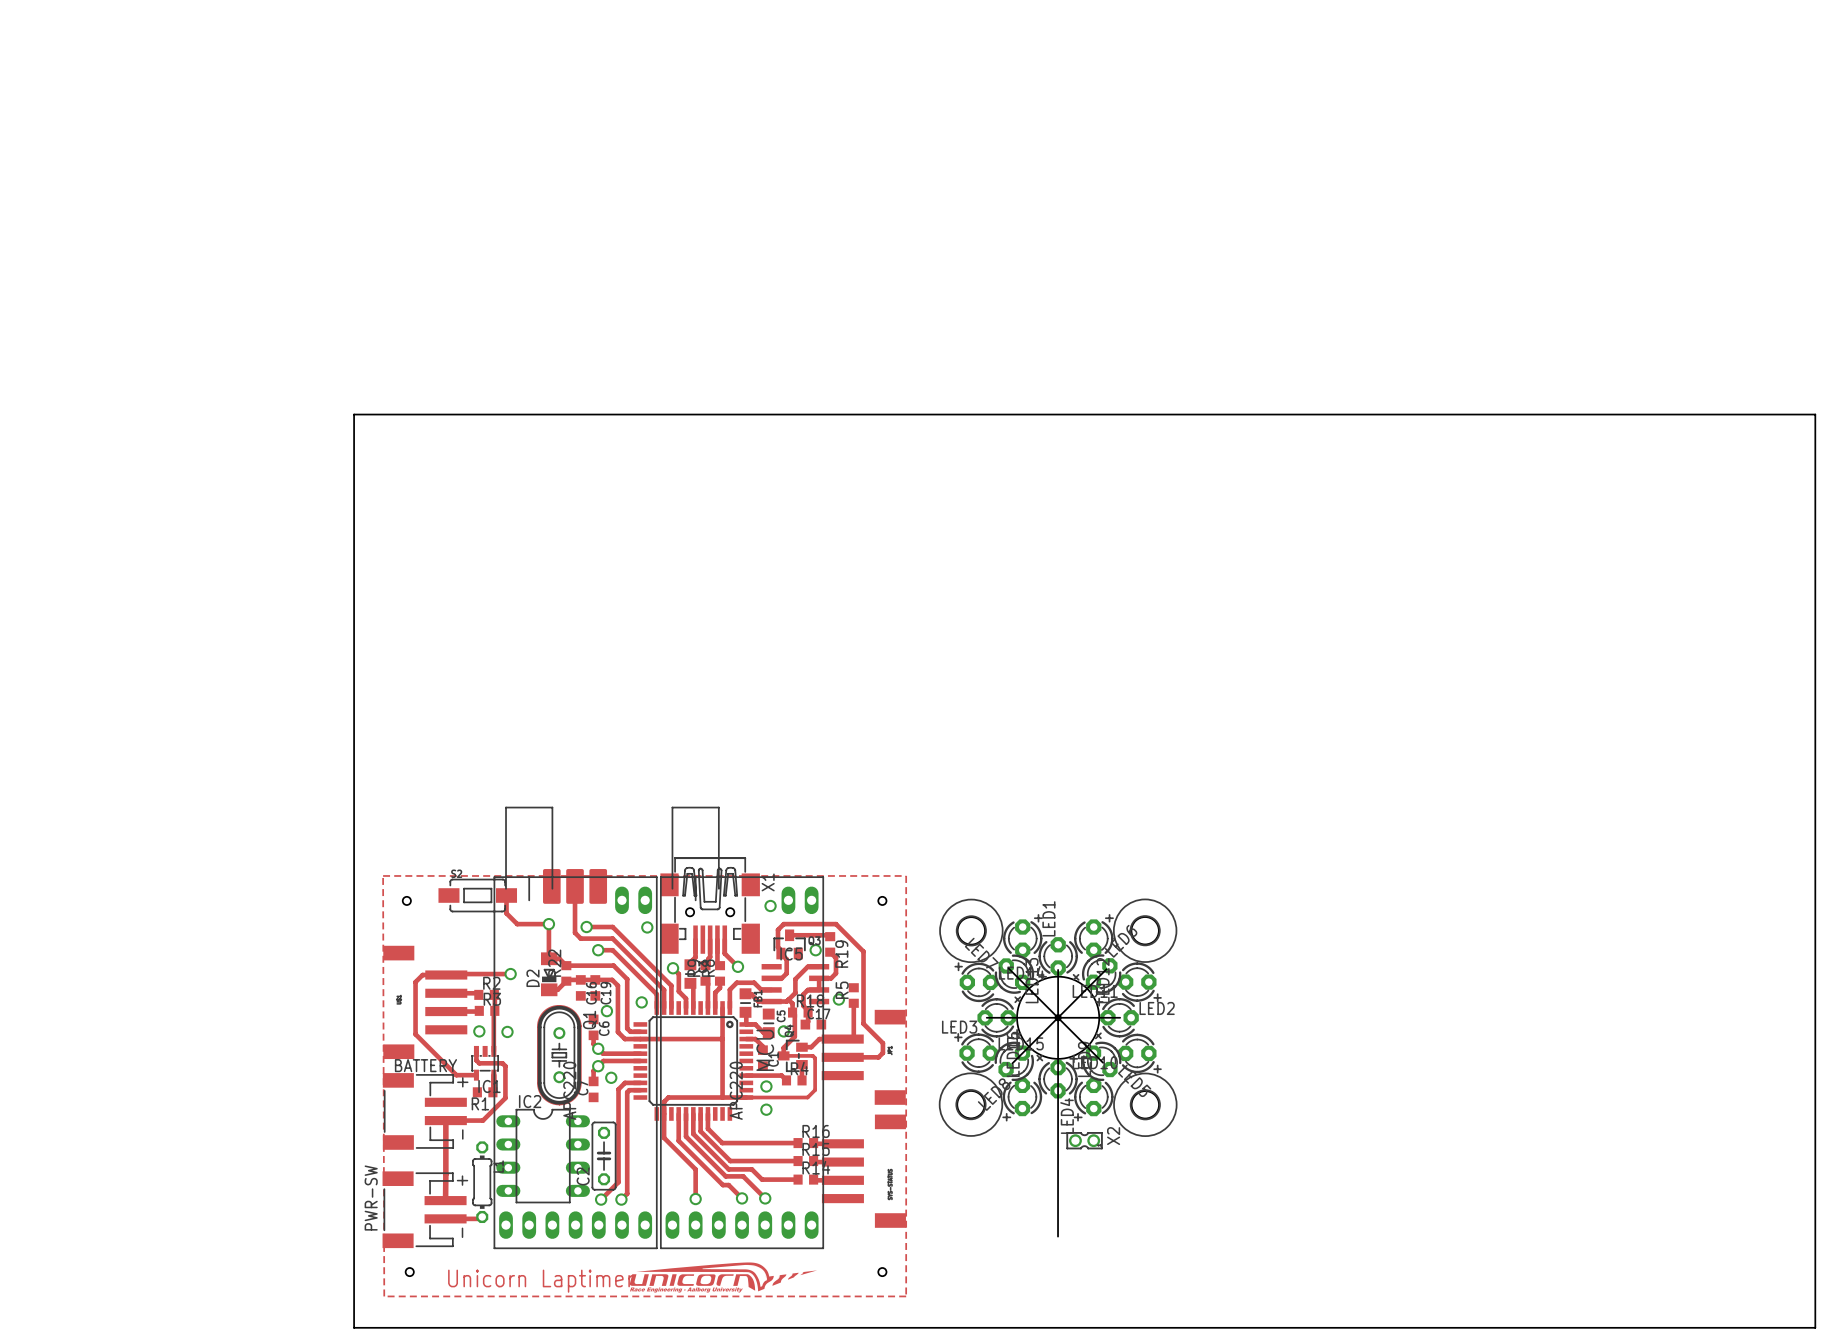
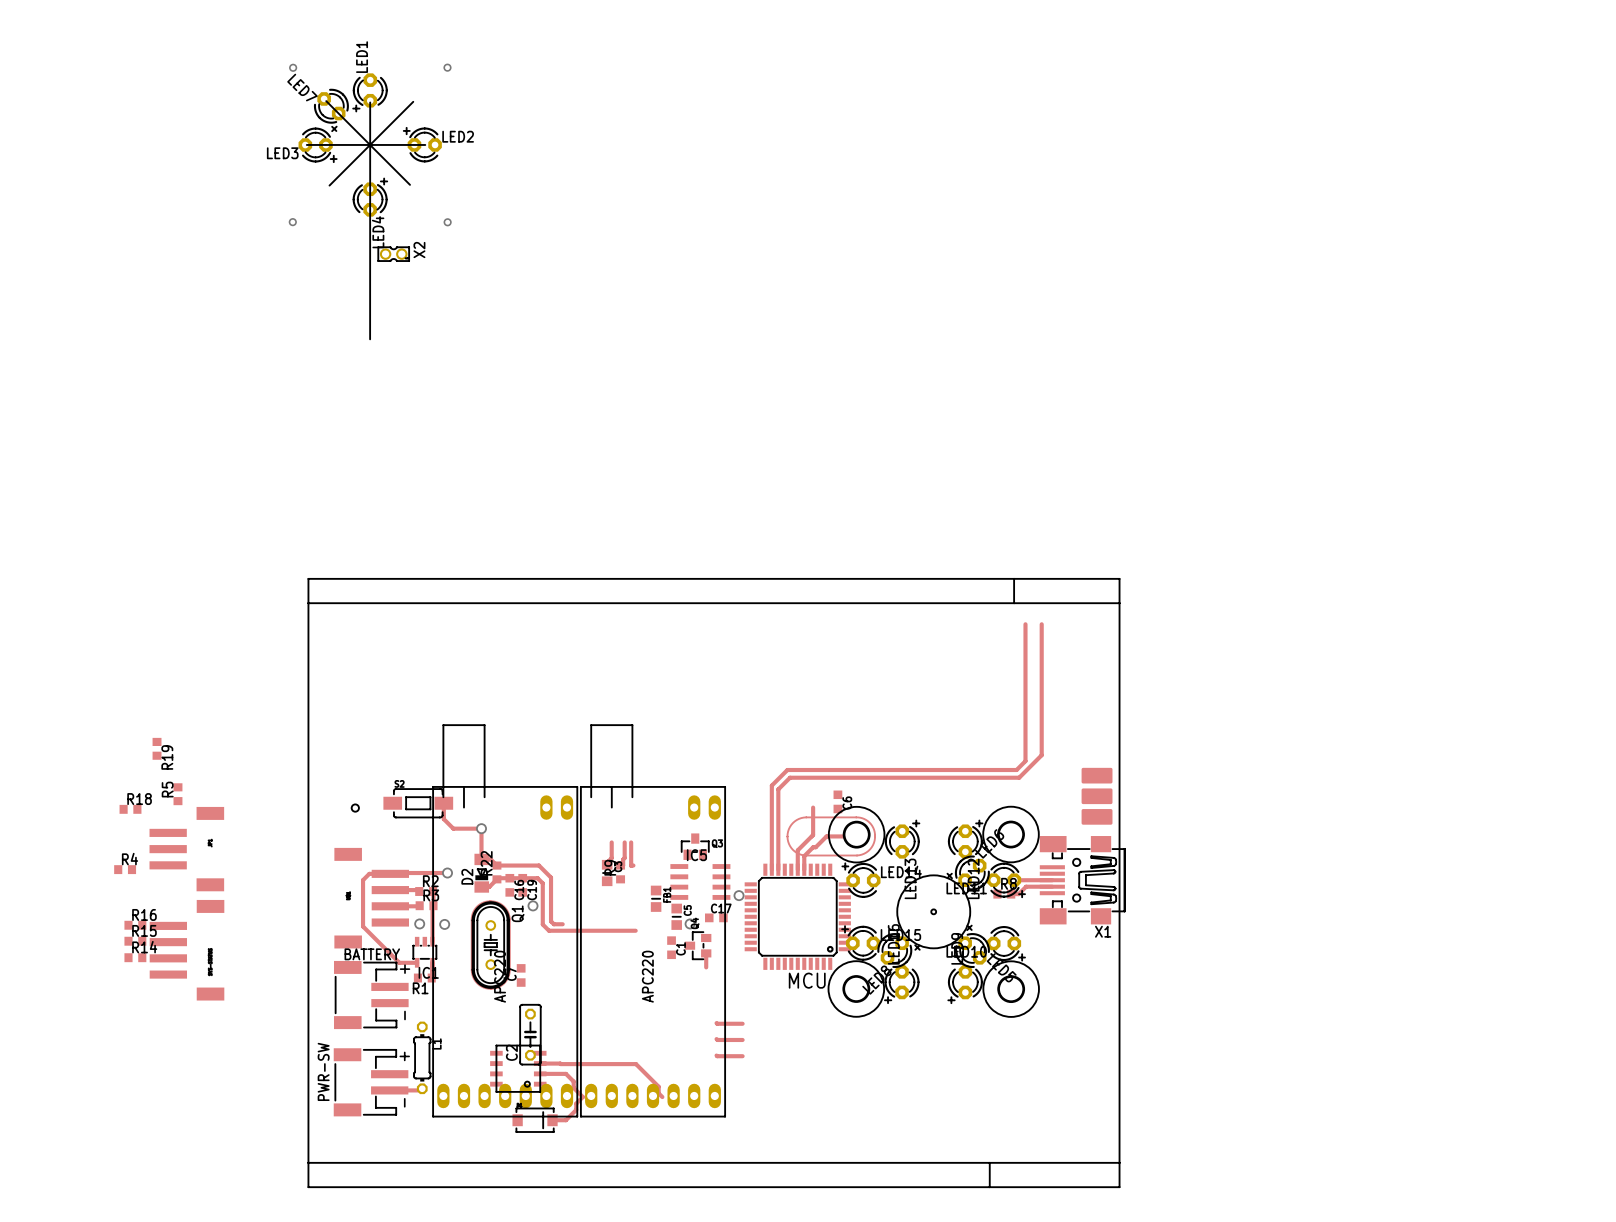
via: none -> (293, 67)
via: none -> (447, 67)
board edge: none -> (326, 101) (410, 184)
board edge: none -> (413, 101) (329, 185)
board edge: none -> (370, 102) (370, 339)
board edge: none -> (306, 144) (425, 144)
via: none -> (292, 222)
via: none -> (447, 222)
board edge: (354, 642) (354, 414) (1815, 414) (1815, 1327) (1267, 1327) -> (308, 578) (1119, 578) (1119, 1187)
board edge: none -> (1014, 578) (1014, 603)
board edge: none -> (308, 603) (1119, 603)
track: none -> (1025, 624) (1025, 761) (1016, 770) (787, 770) (771, 785) (771, 869)
track: none -> (1041, 624) (1041, 755) (1019, 777) (790, 777) (778, 789) (778, 869)
zone outline: (383, 875) (906, 875) (906, 1296) (384, 1296) (383, 875) -> none
track: (575, 886) (575, 932) (580, 938) (612, 938) (664, 990) (664, 1008) -> none
part: (575, 886) -> none
part: none -> (1097, 796)
hole: (882, 900) -> none
track: none -> (813, 807) (813, 835) (797, 850) (797, 869)
X1 rotation: 0° (710, 905) -> 90° clockwise (1082, 880)
X1 position: (710, 905) -> (1082, 880)
via: (770, 906) -> none
track: (586, 927) (612, 927) (671, 985) (671, 1008) -> none
via: (586, 927) -> none
via: (647, 927) -> none
track: none -> (850, 836) (826, 836) (804, 856) (804, 869)
track: none -> (875, 835) (870, 849) (857, 855) (801, 854) (791, 848) (787, 836) (792, 823) (806, 817) (862, 818) (870, 824) (875, 835)
track: (789, 935) (830, 936) -> none
track: (724, 939) (724, 953) (737, 966) -> none
R19 position: (830, 944) -> (157, 748)
track: (598, 950) (612, 950) (656, 994) (656, 1008) -> none
via: (598, 950) -> none
via: (815, 950) -> none
track: (830, 952) (835, 957) (835, 973) (831, 978) (819, 978) (819, 989) (807, 989) (803, 994) (803, 1005) (808, 1012) (808, 1021) (805, 1024) -> none
LED1 position: (1058, 958) -> (370, 92)
via: (737, 966) -> none
track: (819, 966) (807, 966) (795, 979) (795, 992) (786, 1001) (758, 1001) (751, 994) (745, 993) -> none
track: (673, 968) (678, 974) (678, 991) (686, 998) (686, 1008) -> none
via: (673, 968) -> none
board edge: (1008, 968) (1102, 1062) -> none
board edge: (1058, 969) (1058, 1236) -> none
board edge: (1106, 969) (1012, 1063) -> none
R8 rotation: 0° (720, 973) -> 90° clockwise (1004, 894)
R8 position: (720, 973) -> (1004, 894)
track: (771, 978) (781, 978) (786, 973) (786, 959) (778, 947) (778, 929) (783, 924) (835, 924) (863, 951) (863, 1023) (882, 1043) (882, 1052) (878, 1057) (842, 1057) -> none
LED7 position: (1014, 978) -> (331, 110)
track: (705, 981) (707, 983) (707, 1008) -> none
track: (720, 981) (720, 987) (715, 992) (715, 1008) -> none
track: none -> (1052, 880) (1011, 881)
track: (690, 983) (693, 986) (693, 1008) -> none
track: (771, 989) (761, 989) (754, 982) (736, 982) (729, 989) (729, 1008) -> none
track: none -> (1052, 886) (1026, 886) (1018, 894) (1011, 894)
R5 position: (853, 995) -> (177, 794)
track: (788, 999) (792, 1003) (792, 1012) -> none
via: (641, 1002) -> none
track: (853, 1003) (853, 1039) (819, 1039) (811, 1047) (801, 1047) -> none
track: (722, 1008) (722, 1097) -> none
track: (745, 1012) (746, 1024) (755, 1024) (763, 1032) (768, 1032) -> none
track: (792, 1012) (794, 1014) (794, 1036) (783, 1047) (783, 1055) (812, 1055) (815, 1058) (815, 1090) (807, 1097) (668, 1097) (664, 1101) (664, 1137) (695, 1169) (695, 1199) -> none
R18 position: (800, 1012) -> (130, 809)
board edge: (986, 1017) (1120, 1017) -> none
LED3 position: (999, 1017) -> (317, 145)
LED2 position: (1117, 1017) -> (422, 144)
C6 position: (593, 1027) -> (837, 801)
track: (593, 1035) (593, 1044) (603, 1053) (640, 1053) -> none
track: (746, 1039) (755, 1039) (762, 1046) (762, 1050) -> none
via: (598, 1048) -> none
track: (476, 1051) (476, 1060) (479, 1063) (502, 1063) (505, 1066) (505, 1098) (482, 1120) (445, 1120) (445, 1200) -> none
part position: (863, 1057) -> (186, 849)
track: (640, 1060) (603, 1060) (593, 1070) (593, 1081) -> none
MCU rotation: 0° (693, 1060) -> 90° clockwise (797, 916)
MCU position: (693, 1060) -> (797, 916)
part: none -> (187, 950)
via: (598, 1066) -> none
track: (746, 1075) (781, 1075) (786, 1080) -> none
LED4 position: (1058, 1076) -> (370, 197)
via: (611, 1077) -> none
R4 position: (794, 1080) -> (125, 869)
track: (640, 1082) (625, 1082) (618, 1089) (618, 1182) (601, 1199) -> none
via: (766, 1086) -> none
track: (640, 1090) (629, 1090) (627, 1092) (627, 1193) (621, 1199) -> none
via: (766, 1109) -> none
track: (678, 1113) (678, 1140) (722, 1185) (728, 1185) (742, 1198) -> none
track: (686, 1113) (686, 1136) (725, 1176) (743, 1176) (765, 1198) -> none
track: (693, 1113) (693, 1133) (728, 1169) (751, 1169) (762, 1179) (798, 1179) -> none
track: (700, 1113) (700, 1131) (730, 1161) (798, 1161) -> none
track: (707, 1113) (707, 1128) (722, 1143) (798, 1143) -> none
X2 position: (1084, 1140) -> (393, 254)
R16 position: (805, 1143) -> (135, 925)
IC2: (543, 1156) -> none
R15 position: (805, 1161) -> (135, 941)
part: (863, 1171) -> none
R14 position: (805, 1179) -> (135, 957)
track: none -> (540, 1063) (636, 1064) (658, 1086) (658, 1093) (662, 1097)
part: none -> (518, 1068)
via: (742, 1198) -> none
via: (765, 1198) -> none
via: (601, 1199) -> none
via: (621, 1199) -> none
via: (695, 1199) -> none
track: none -> (540, 1073) (565, 1073) (573, 1081) (573, 1087) (582, 1097) (576, 1103) (576, 1109) (565, 1120) (552, 1120)
part: none -> (535, 1120)
drawing: [629, 1262, 817, 1293] -> none
hole: (409, 1272) -> none
hole: (882, 1272) -> none
text: Unicorn Laptimer (541, 1281) -> none
board edge: none -> (308, 1162) (1119, 1162)
board edge: none -> (989, 1162) (989, 1187)

